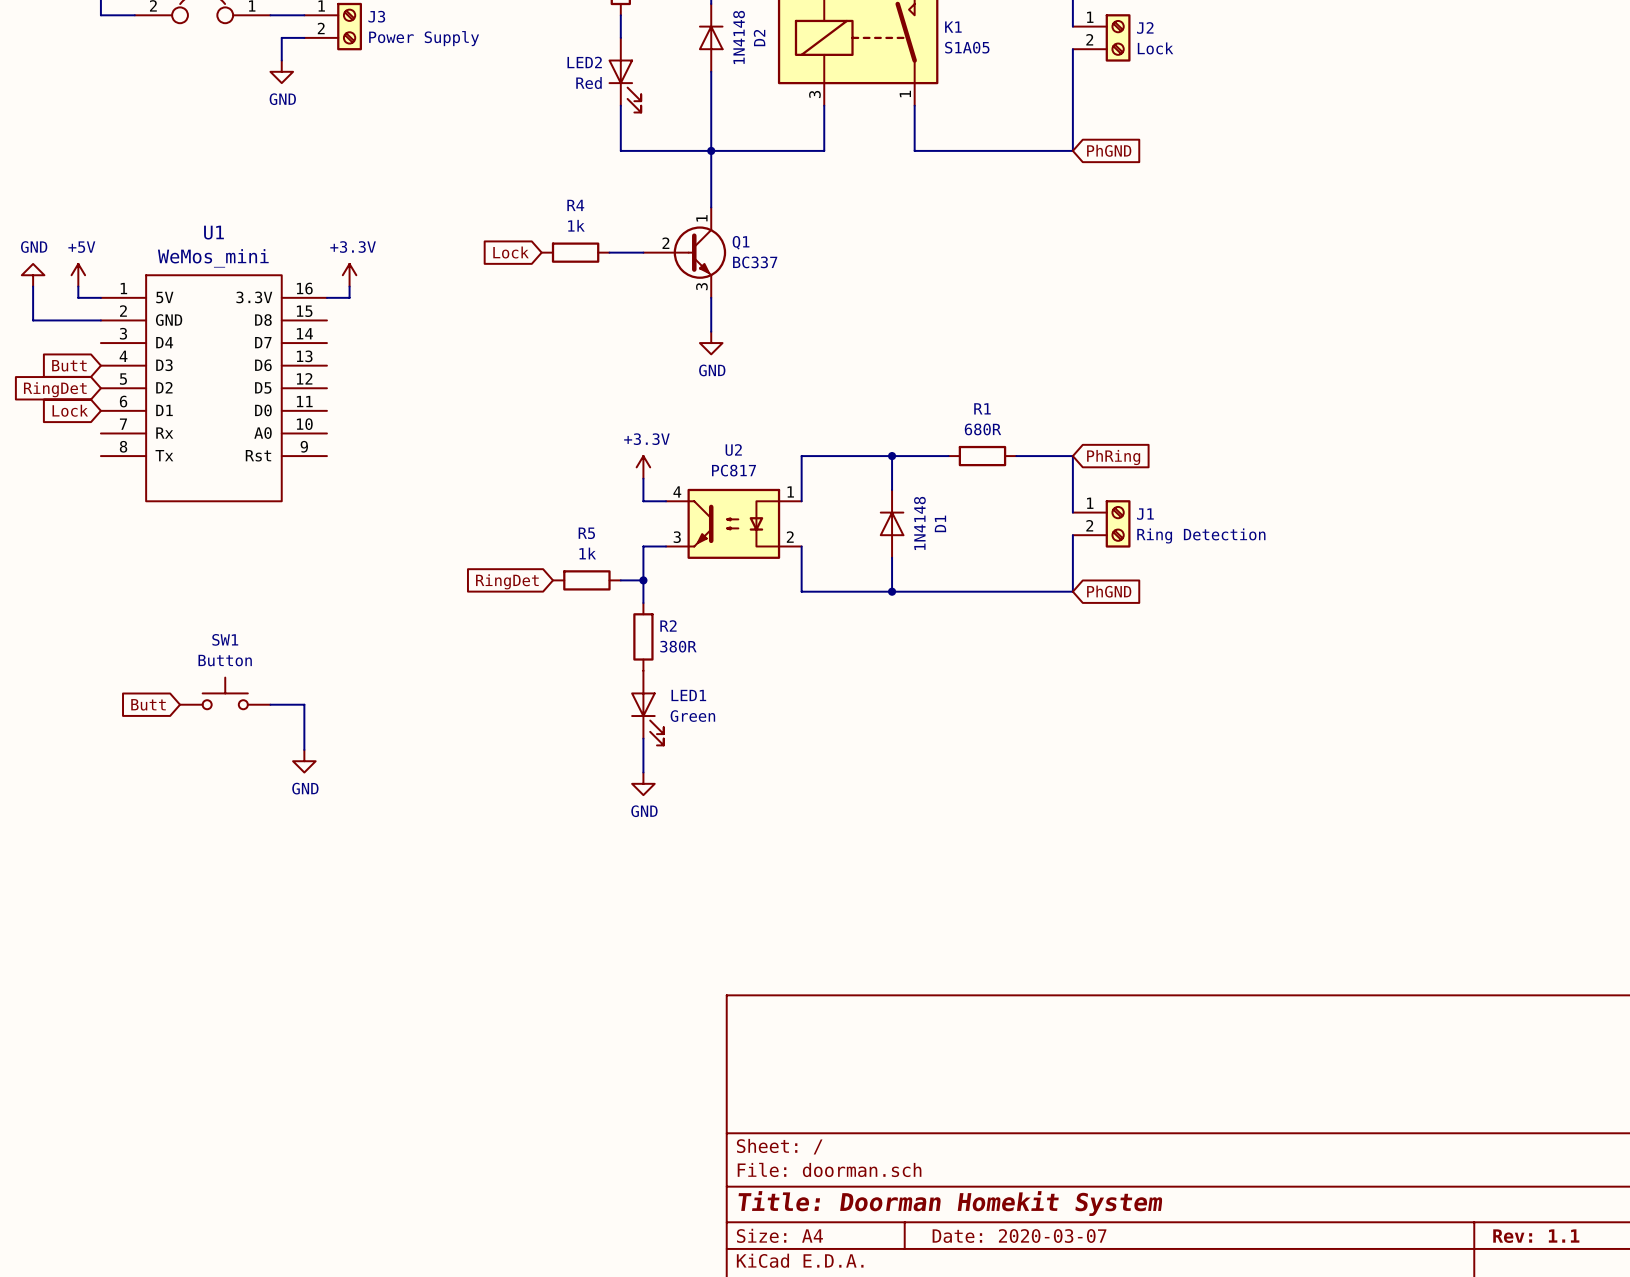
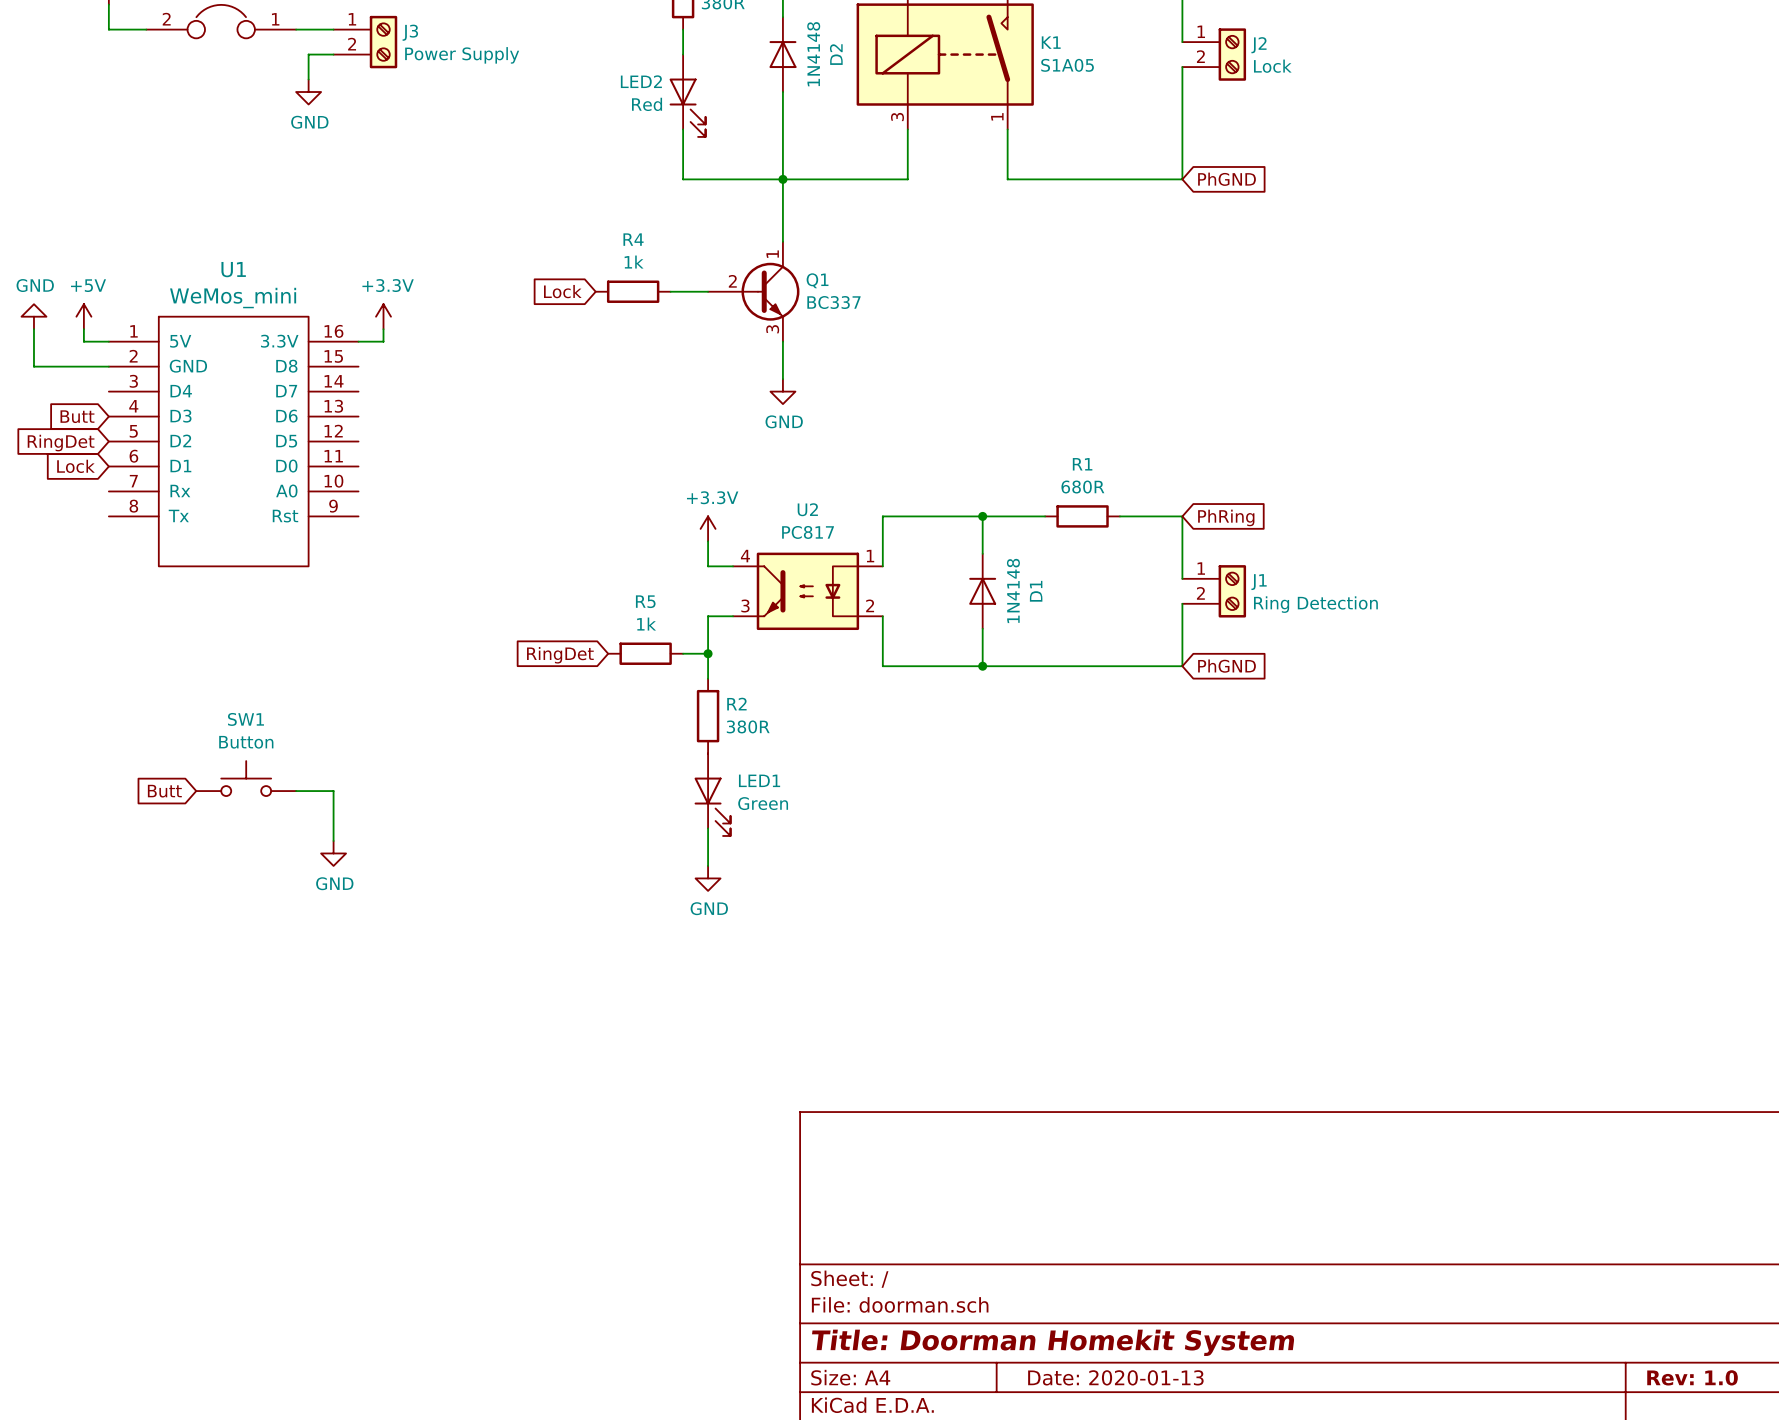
title block: Date: 2020-03-07 (1019, 1236) -> Date: 2020-01-13 (1115, 1377)
title block: Rev: 1.1 (1536, 1236) -> Rev: 1.0 (1692, 1377)

